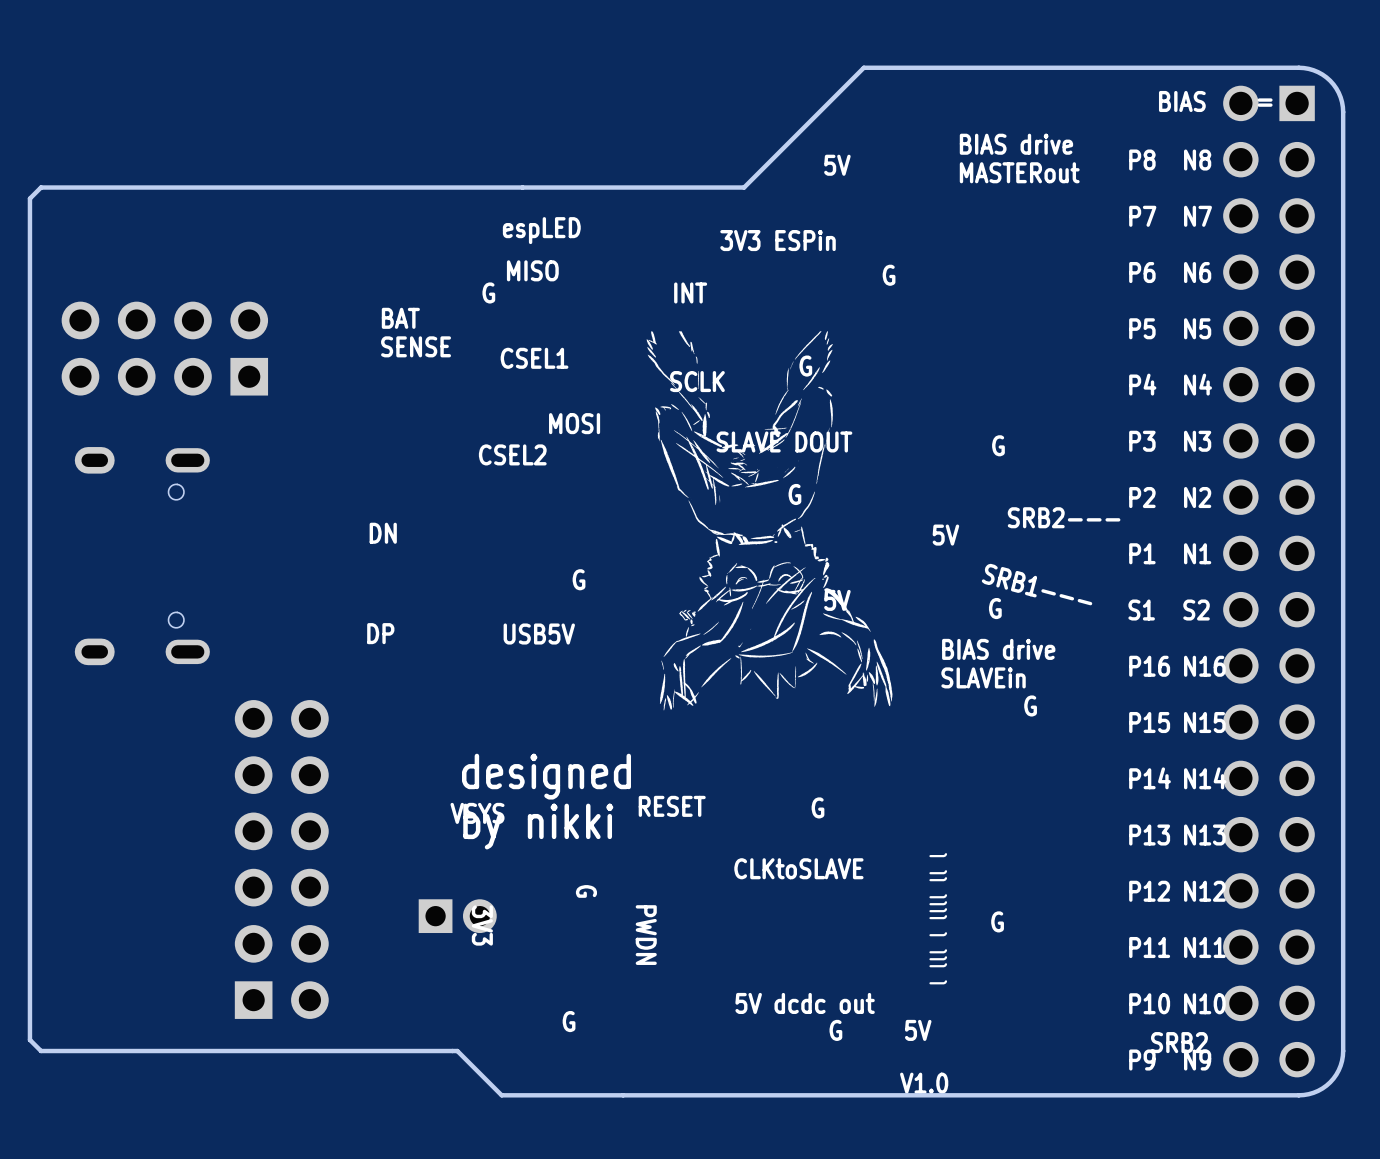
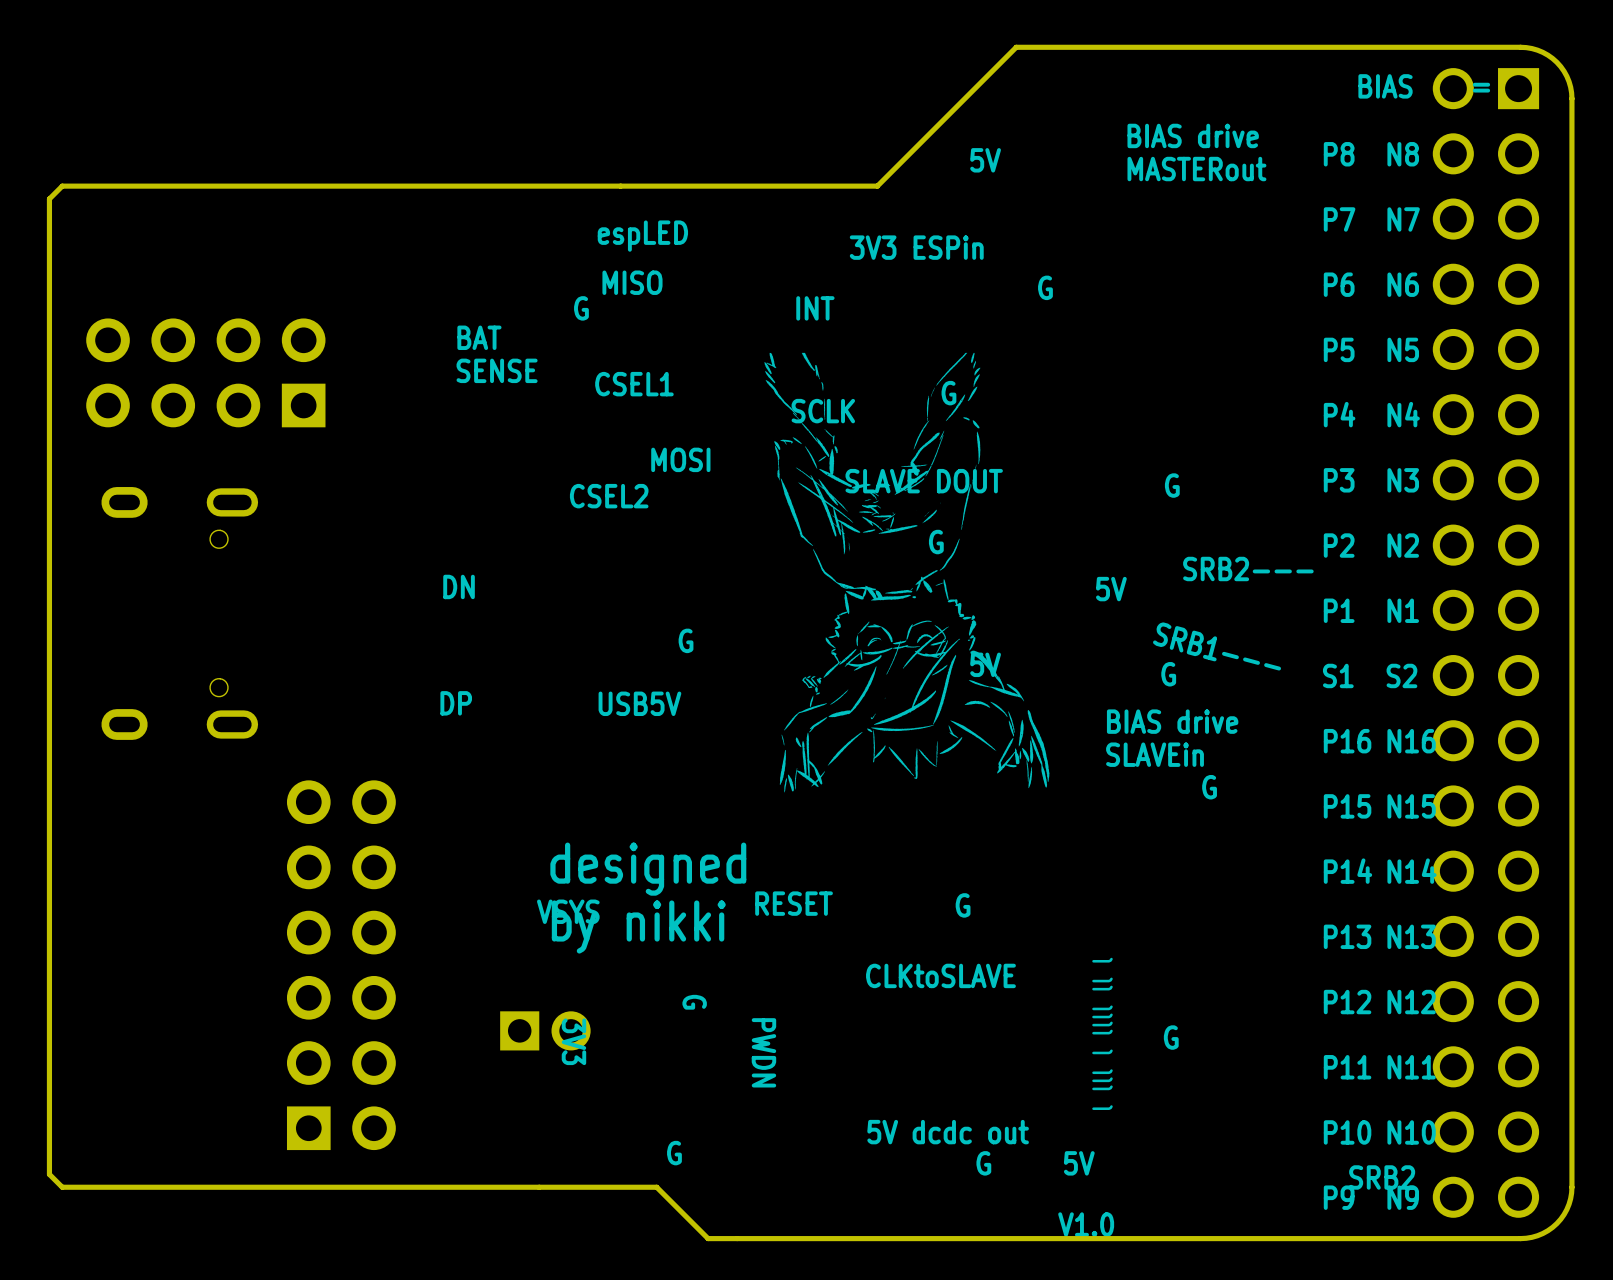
board edge: (457, 1051) (501, 1095) (598, 1095) -> (545, 1187) (656, 1187) (708, 1238)

